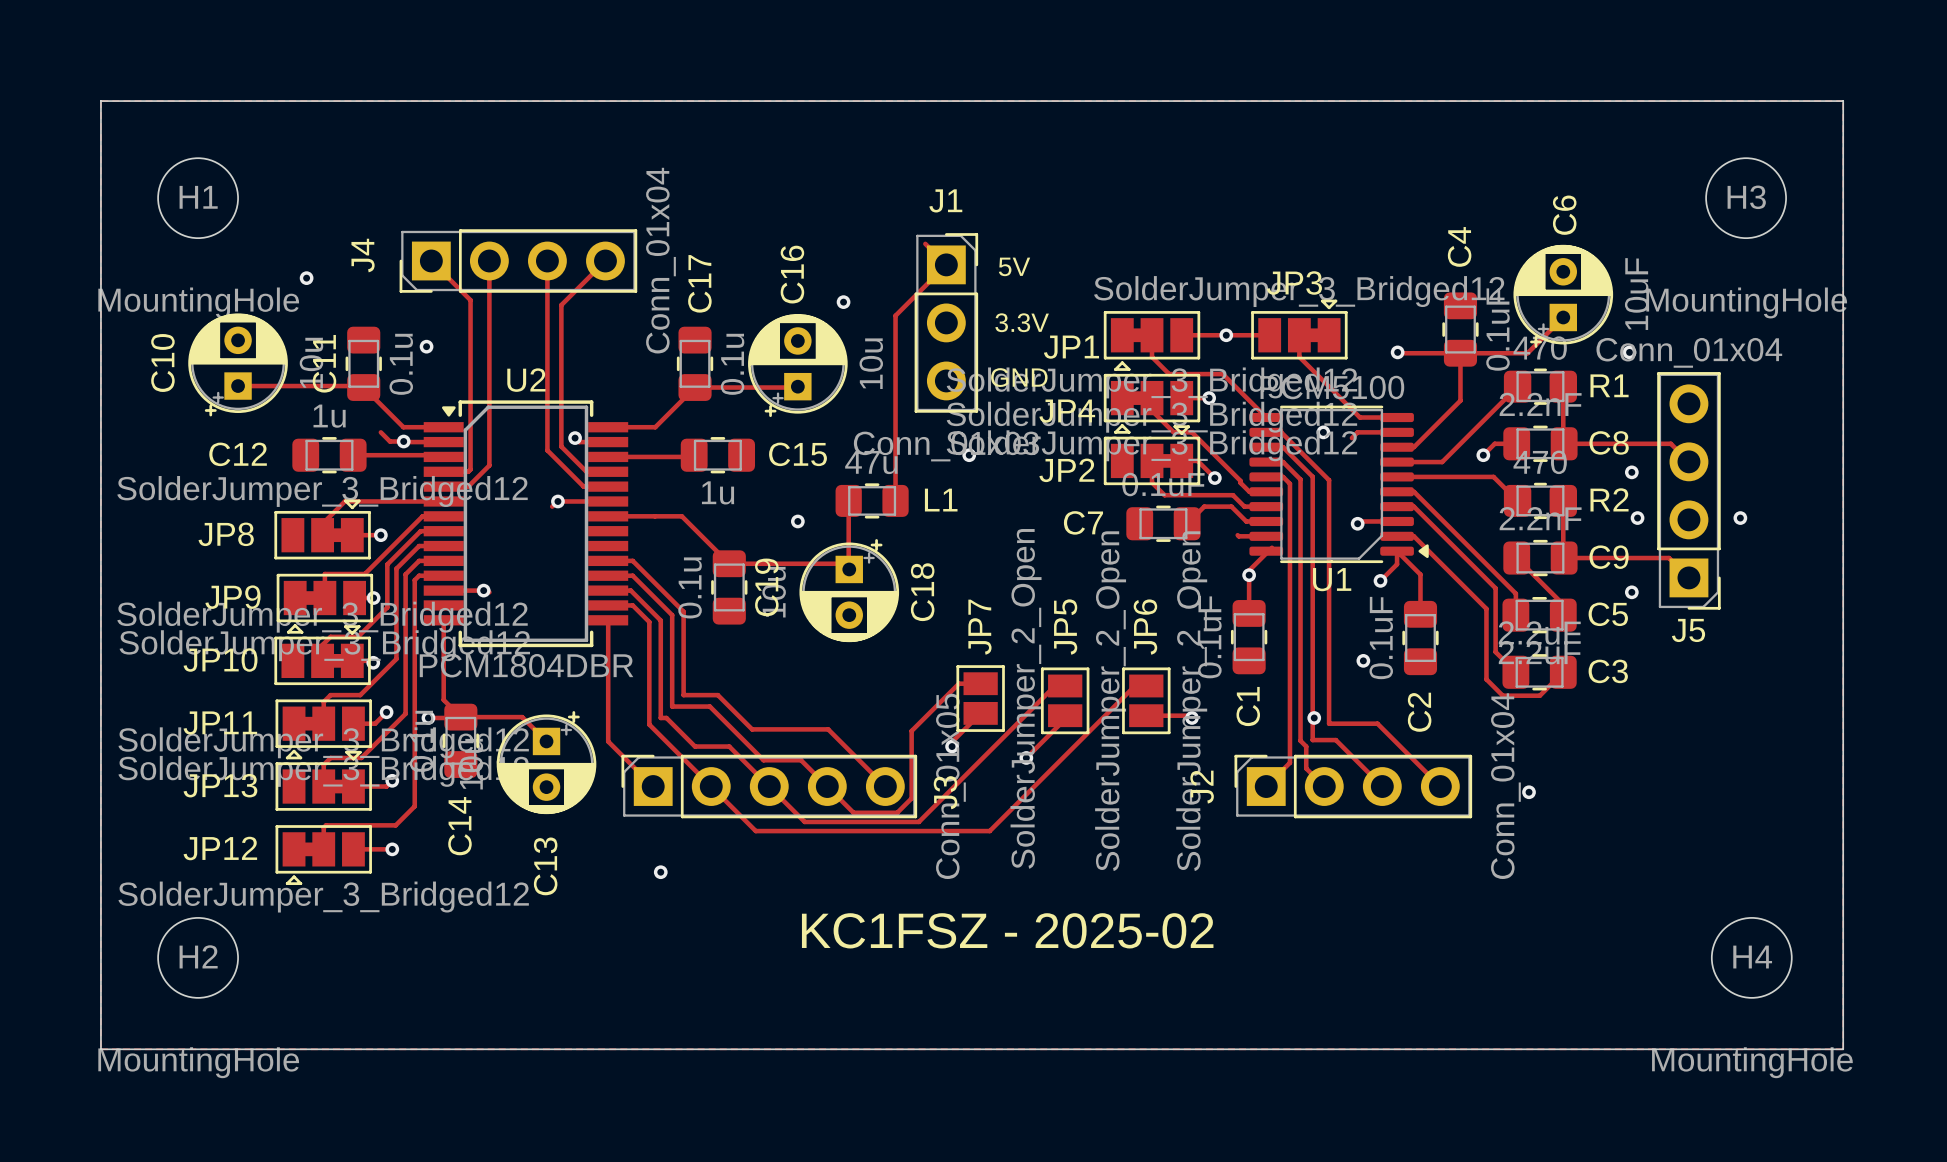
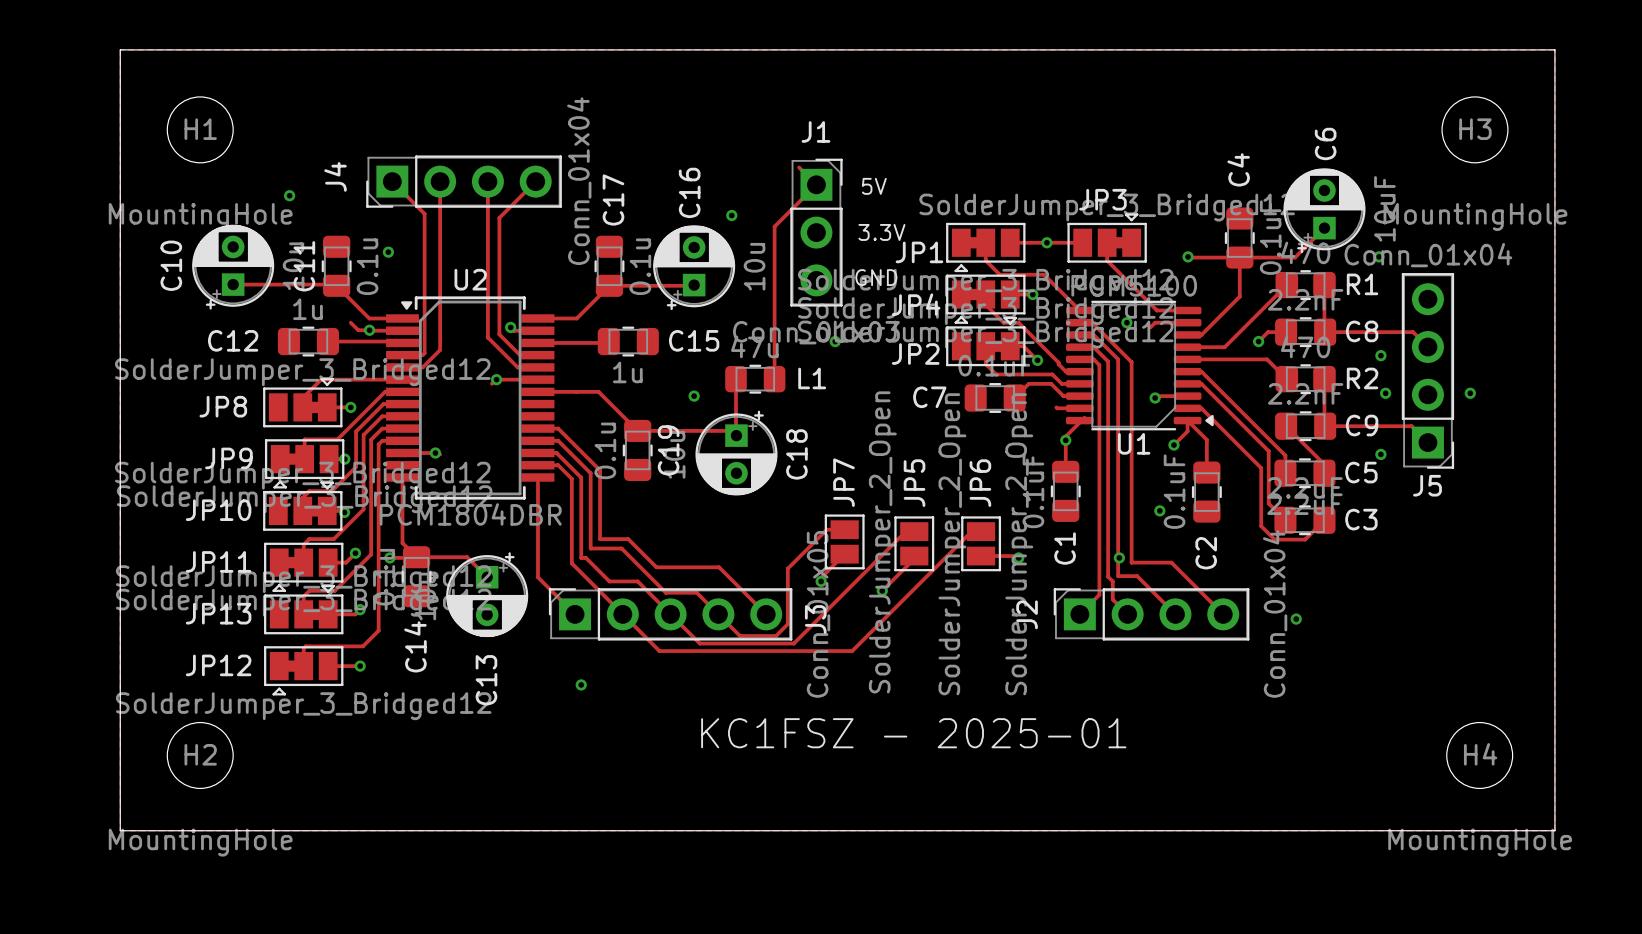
text: KC1FSZ - 2025-02 (1007, 930) -> KC1FSZ - 2025-01 (913, 733)

